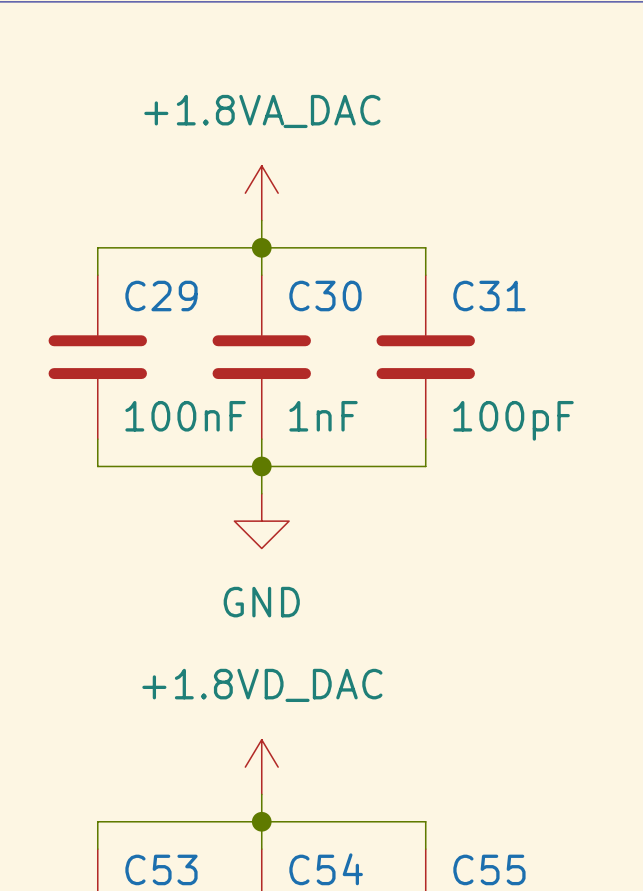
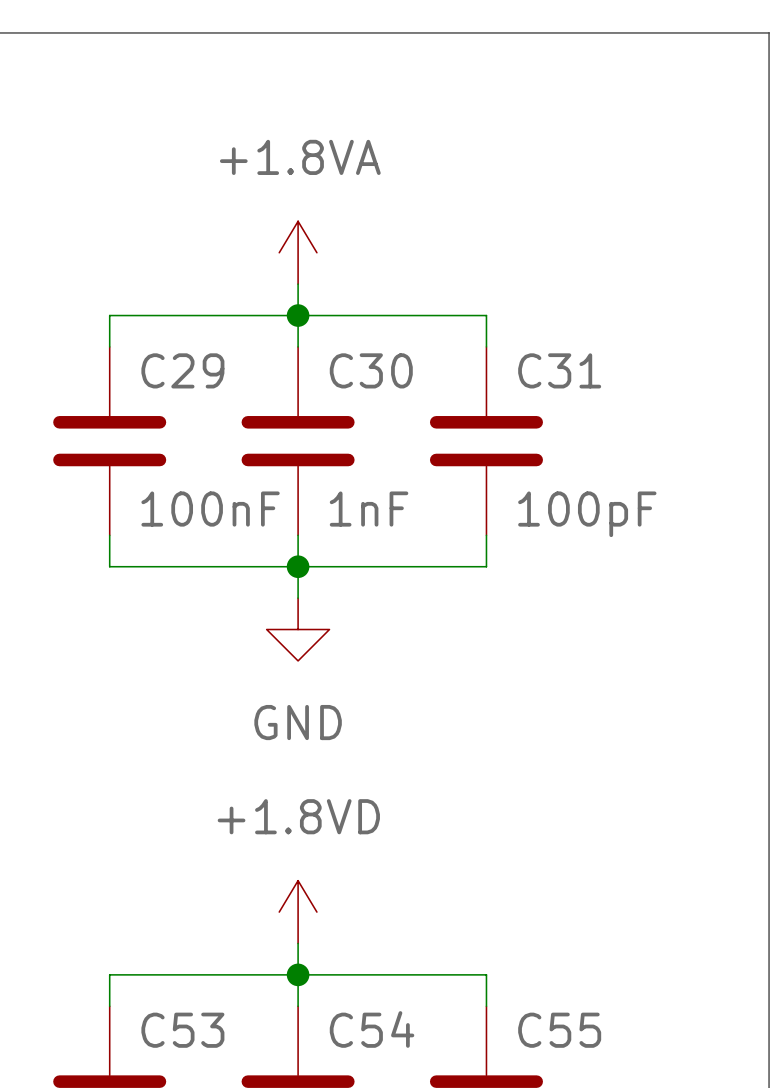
power symbol: +1.8VA_DAC (261, 193) -> +1.8VA (298, 252)
power symbol: +1.8VD_DAC (261, 767) -> +1.8VD (298, 912)

